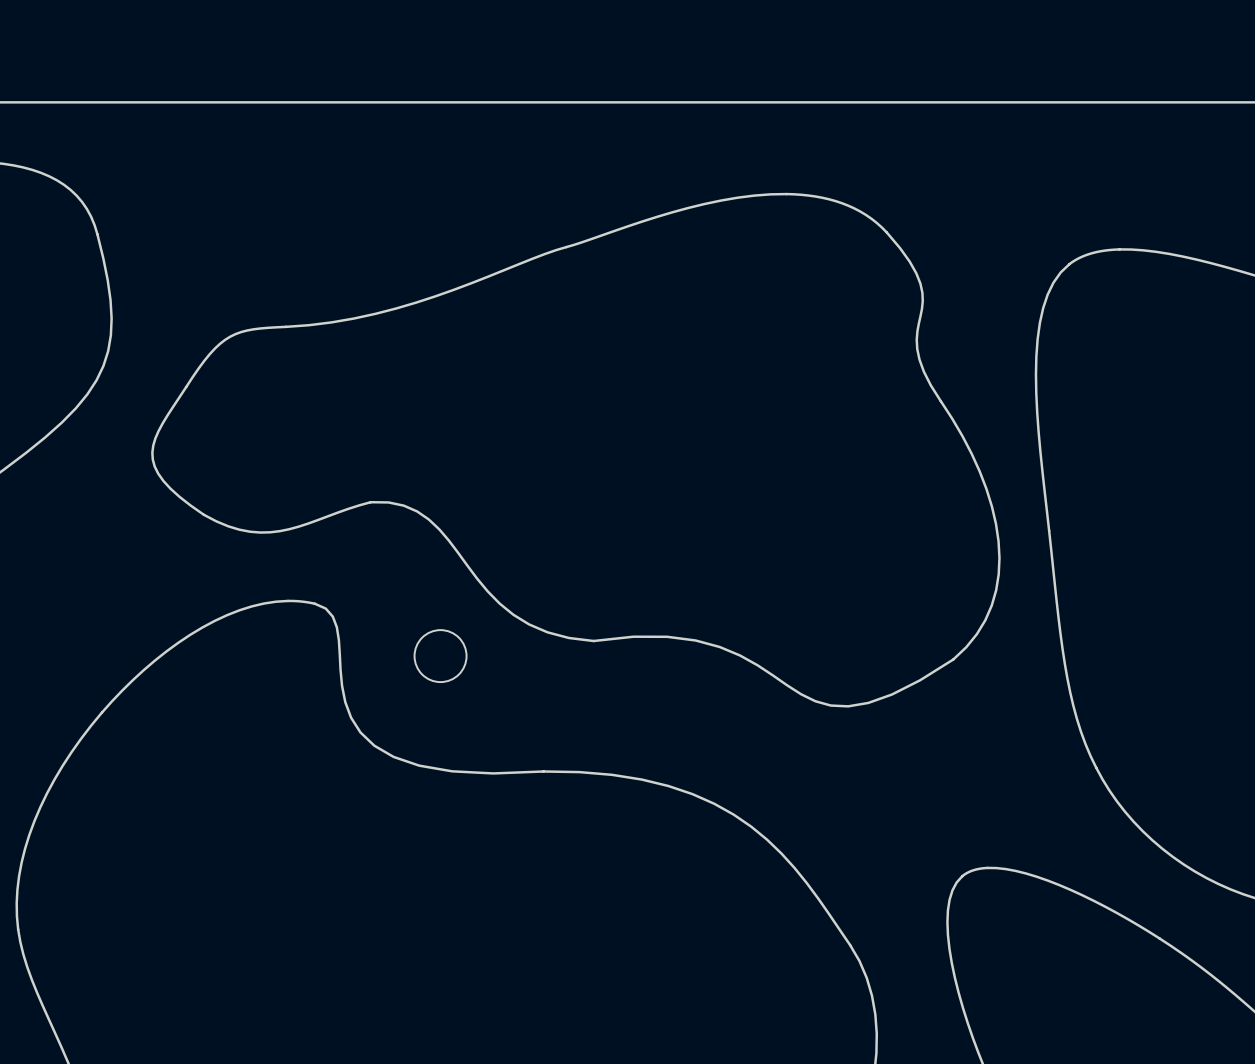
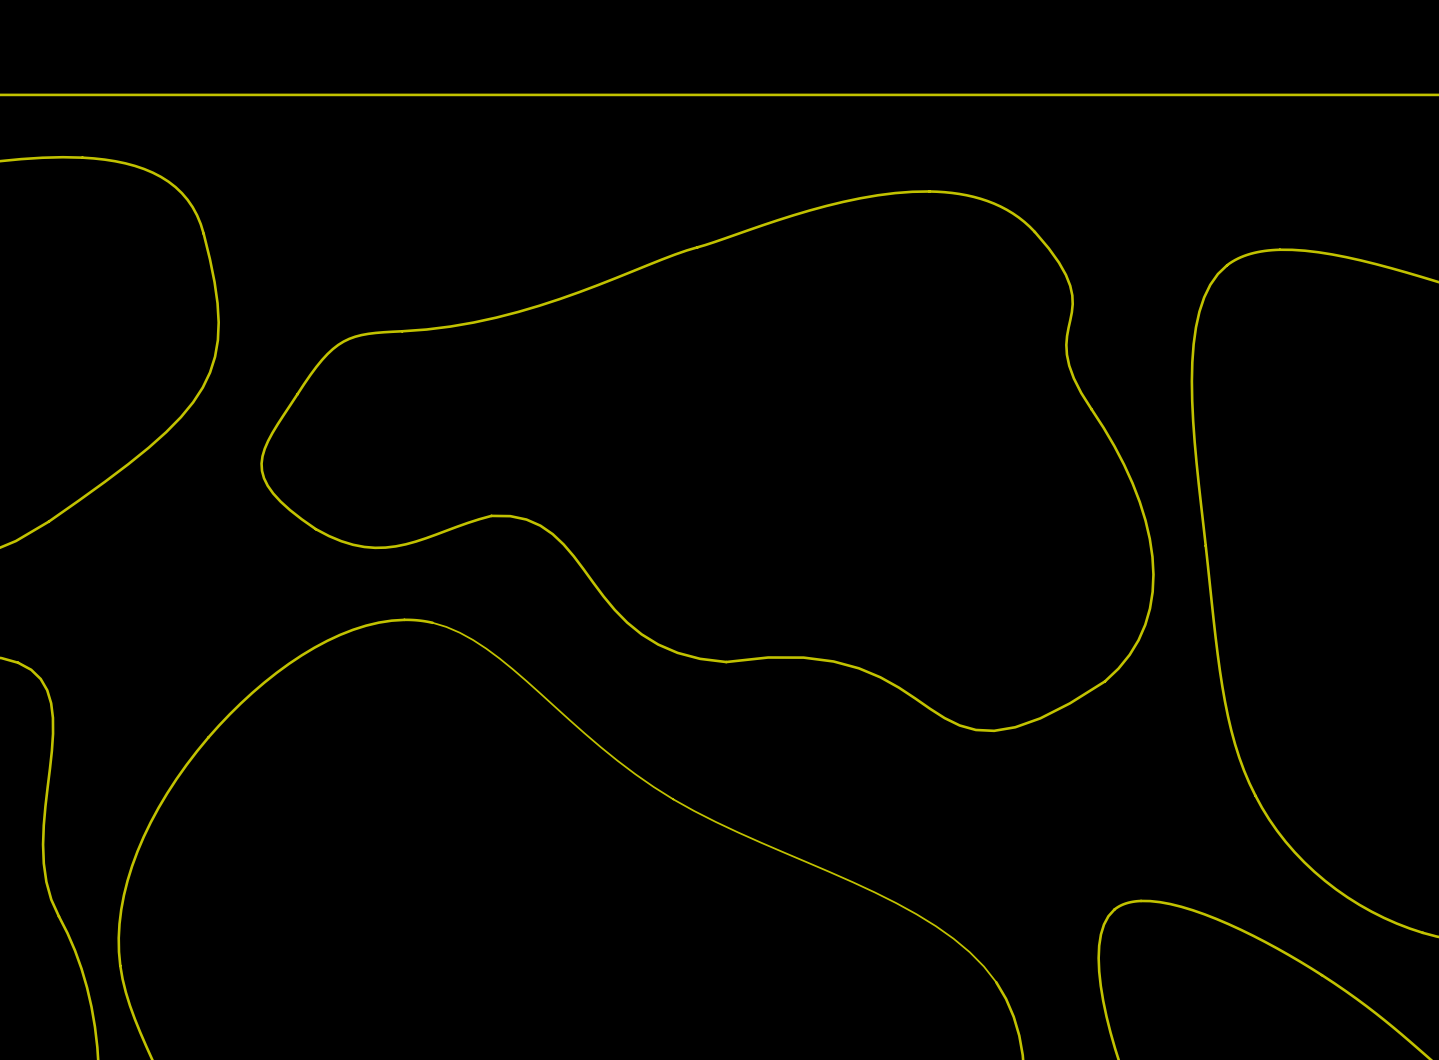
board edge: (314, 603) (325, 608) (332, 616) (338, 640) (342, 685) (345, 702) (351, 717) (360, 732) (374, 745) (393, 756) (419, 765) (452, 771) (493, 773) (579, 772) (612, 774) (641, 779) (692, 794) (733, 814) (767, 839) (806, 883) (850, 945) -> (432, 622) (459, 632) (499, 658) (600, 747) (653, 787) (715, 821) (852, 882) (916, 914) (953, 938) (969, 952) (996, 982)
round board edge: [413, 629, 468, 683] -> none

